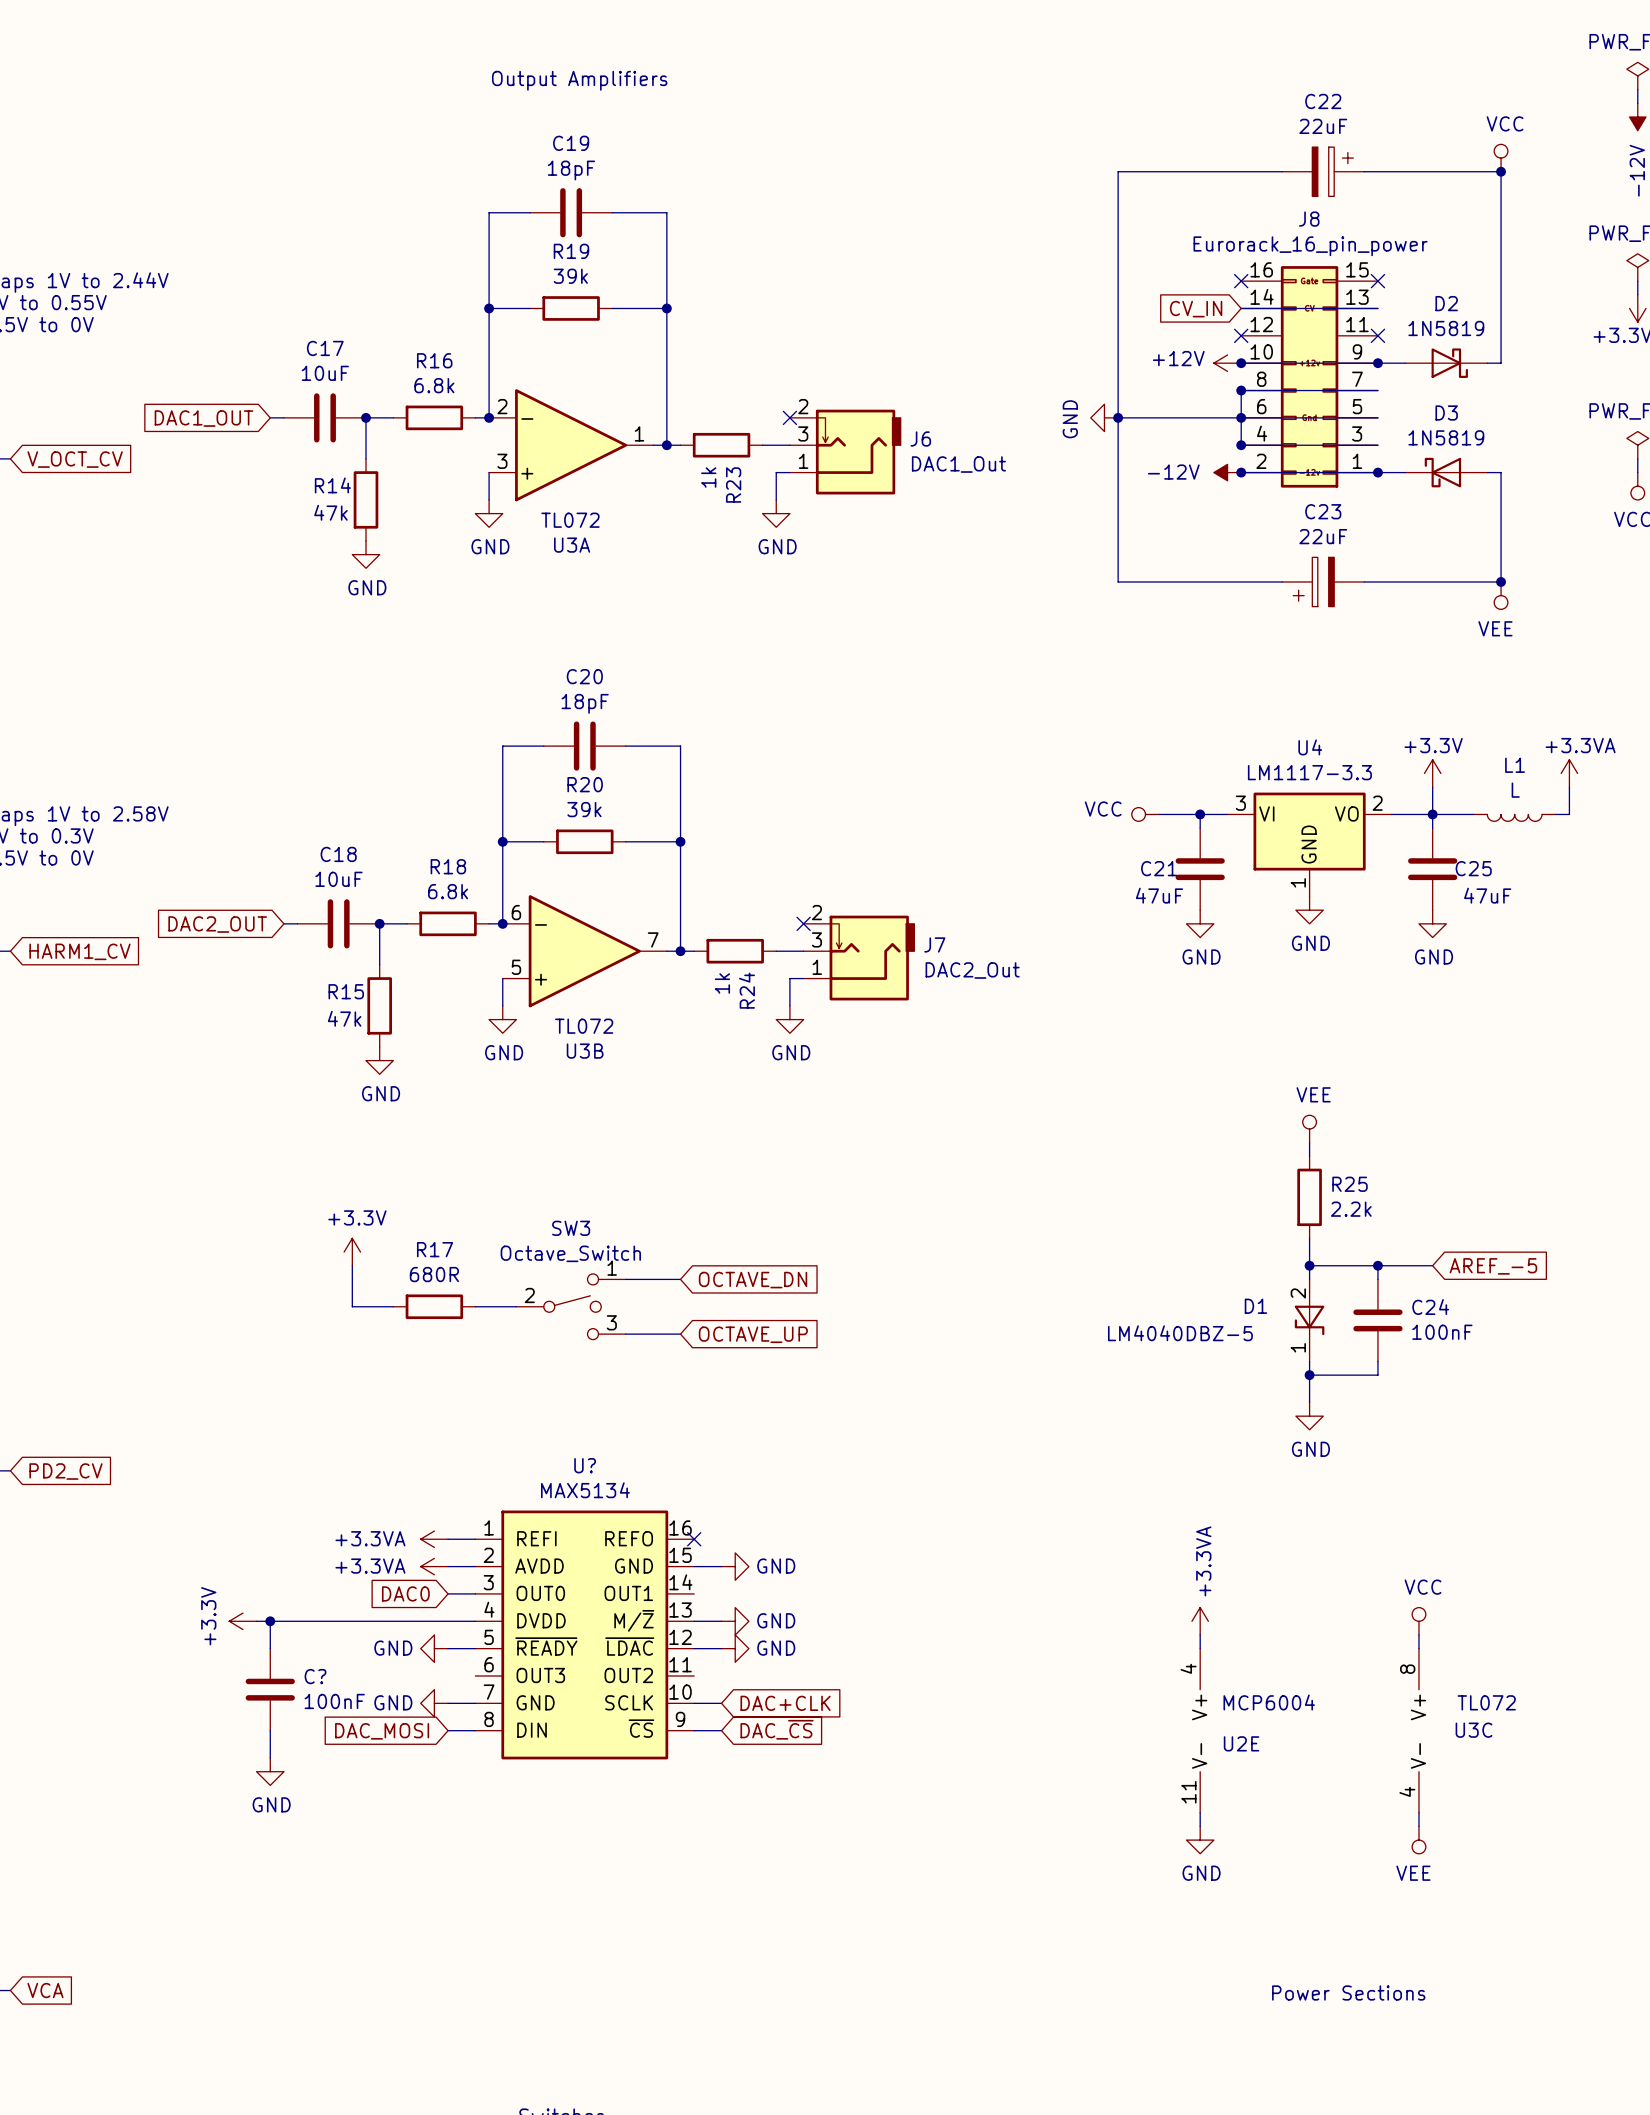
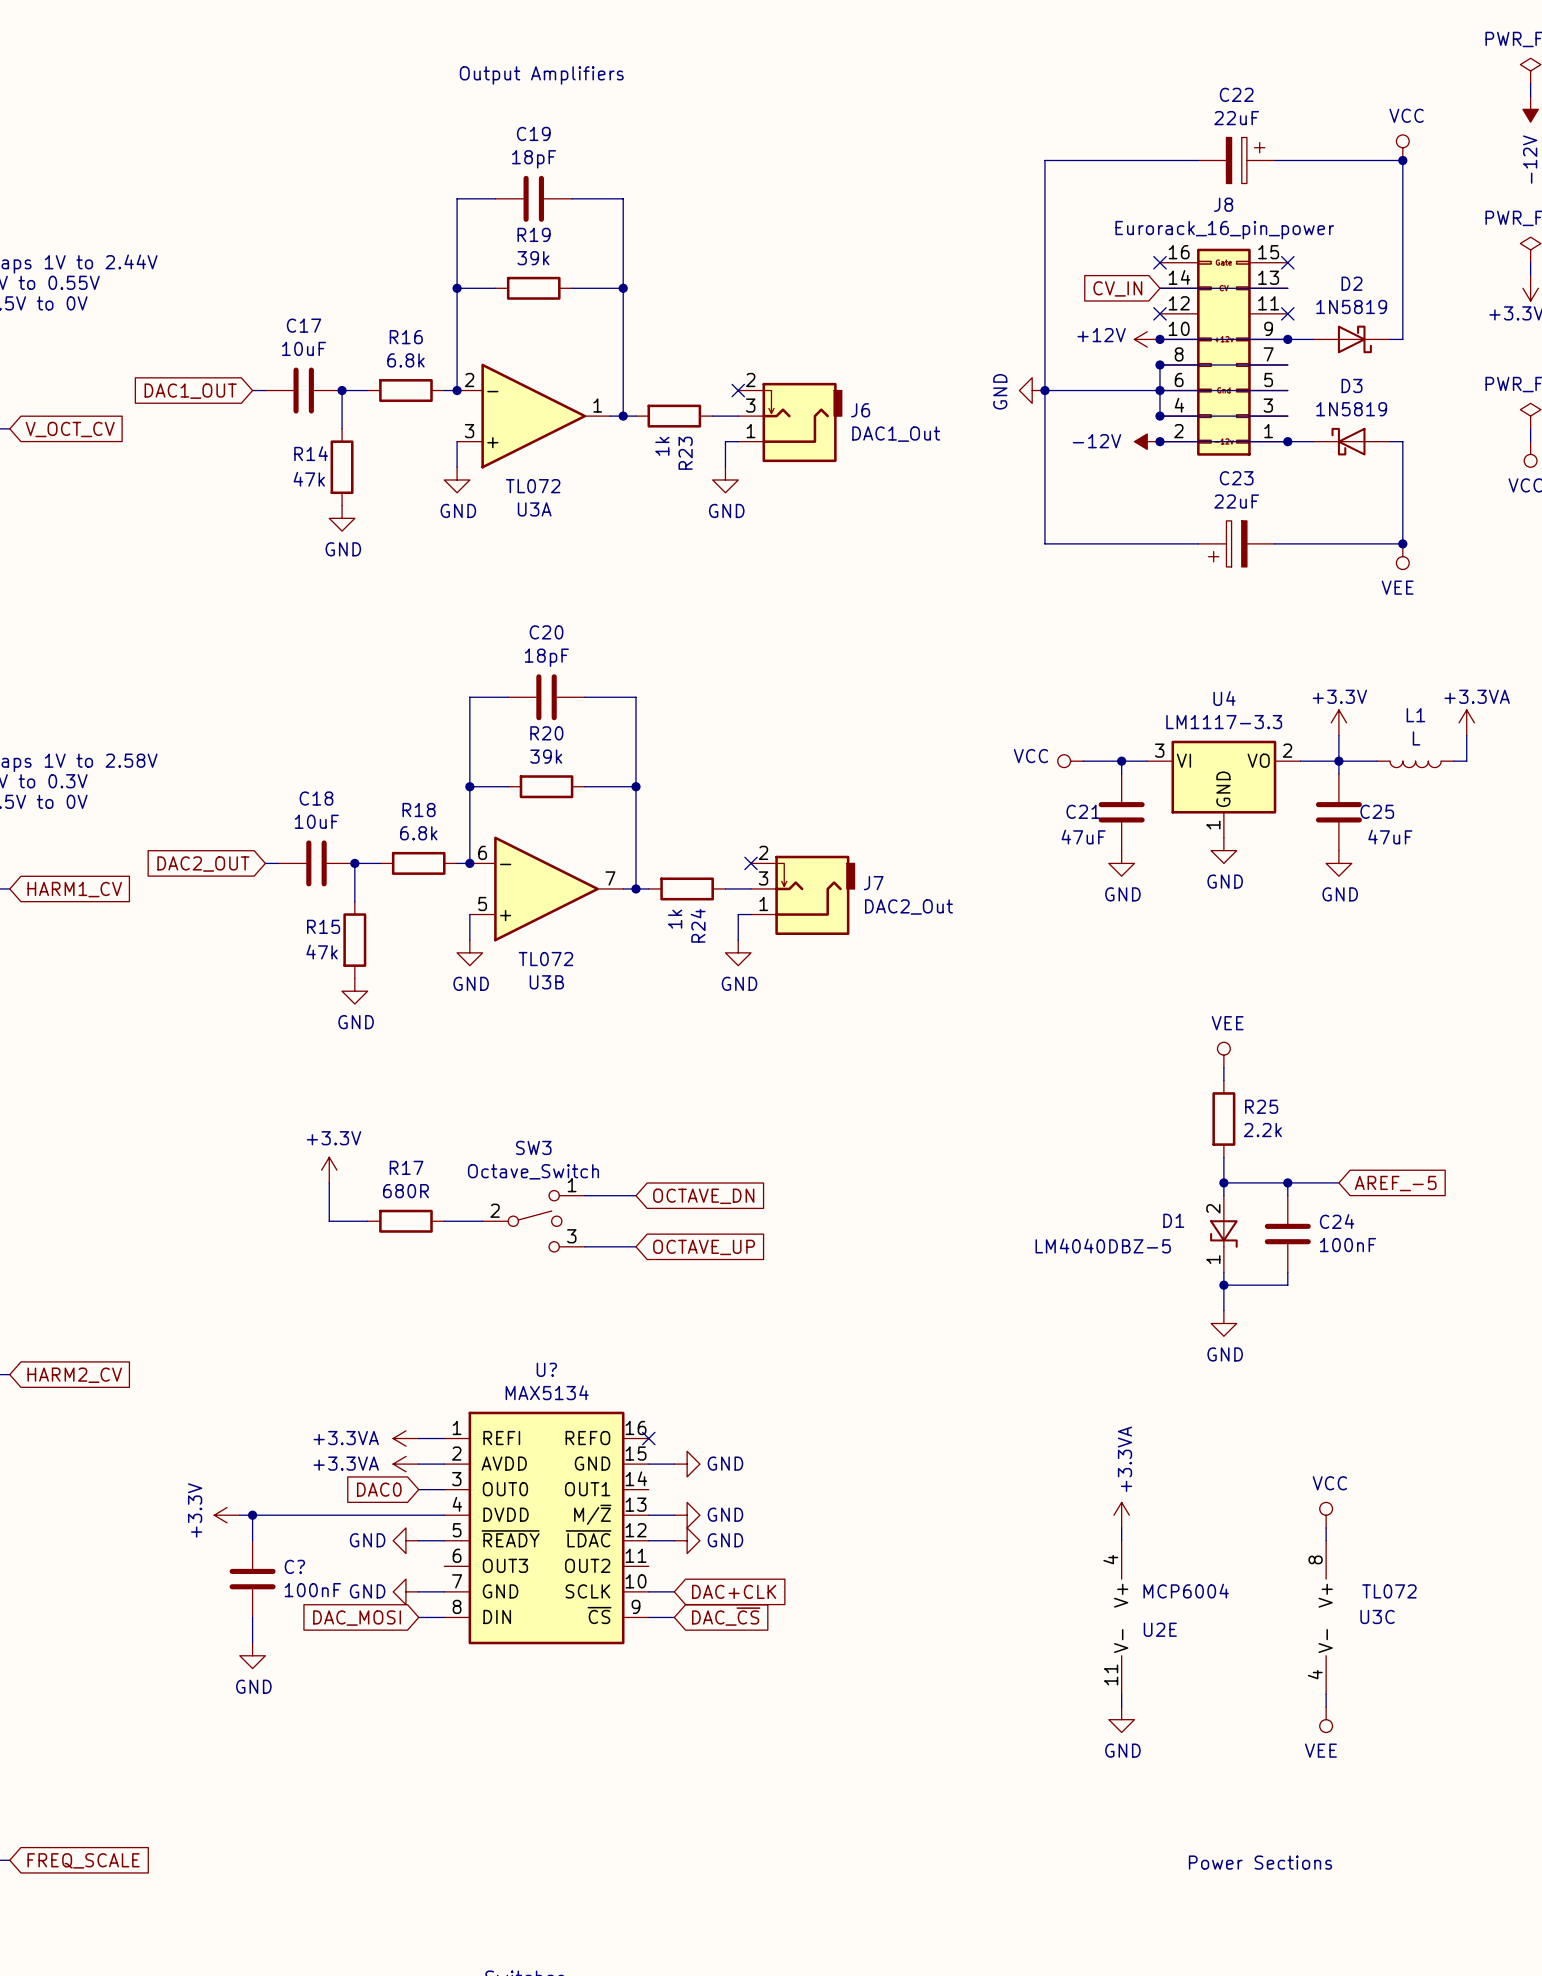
global label: PD2_CV (65, 1471) -> HARM2_CV (74, 1375)
global label: VCA (45, 1990) -> FREQ_SCALE (83, 1860)

